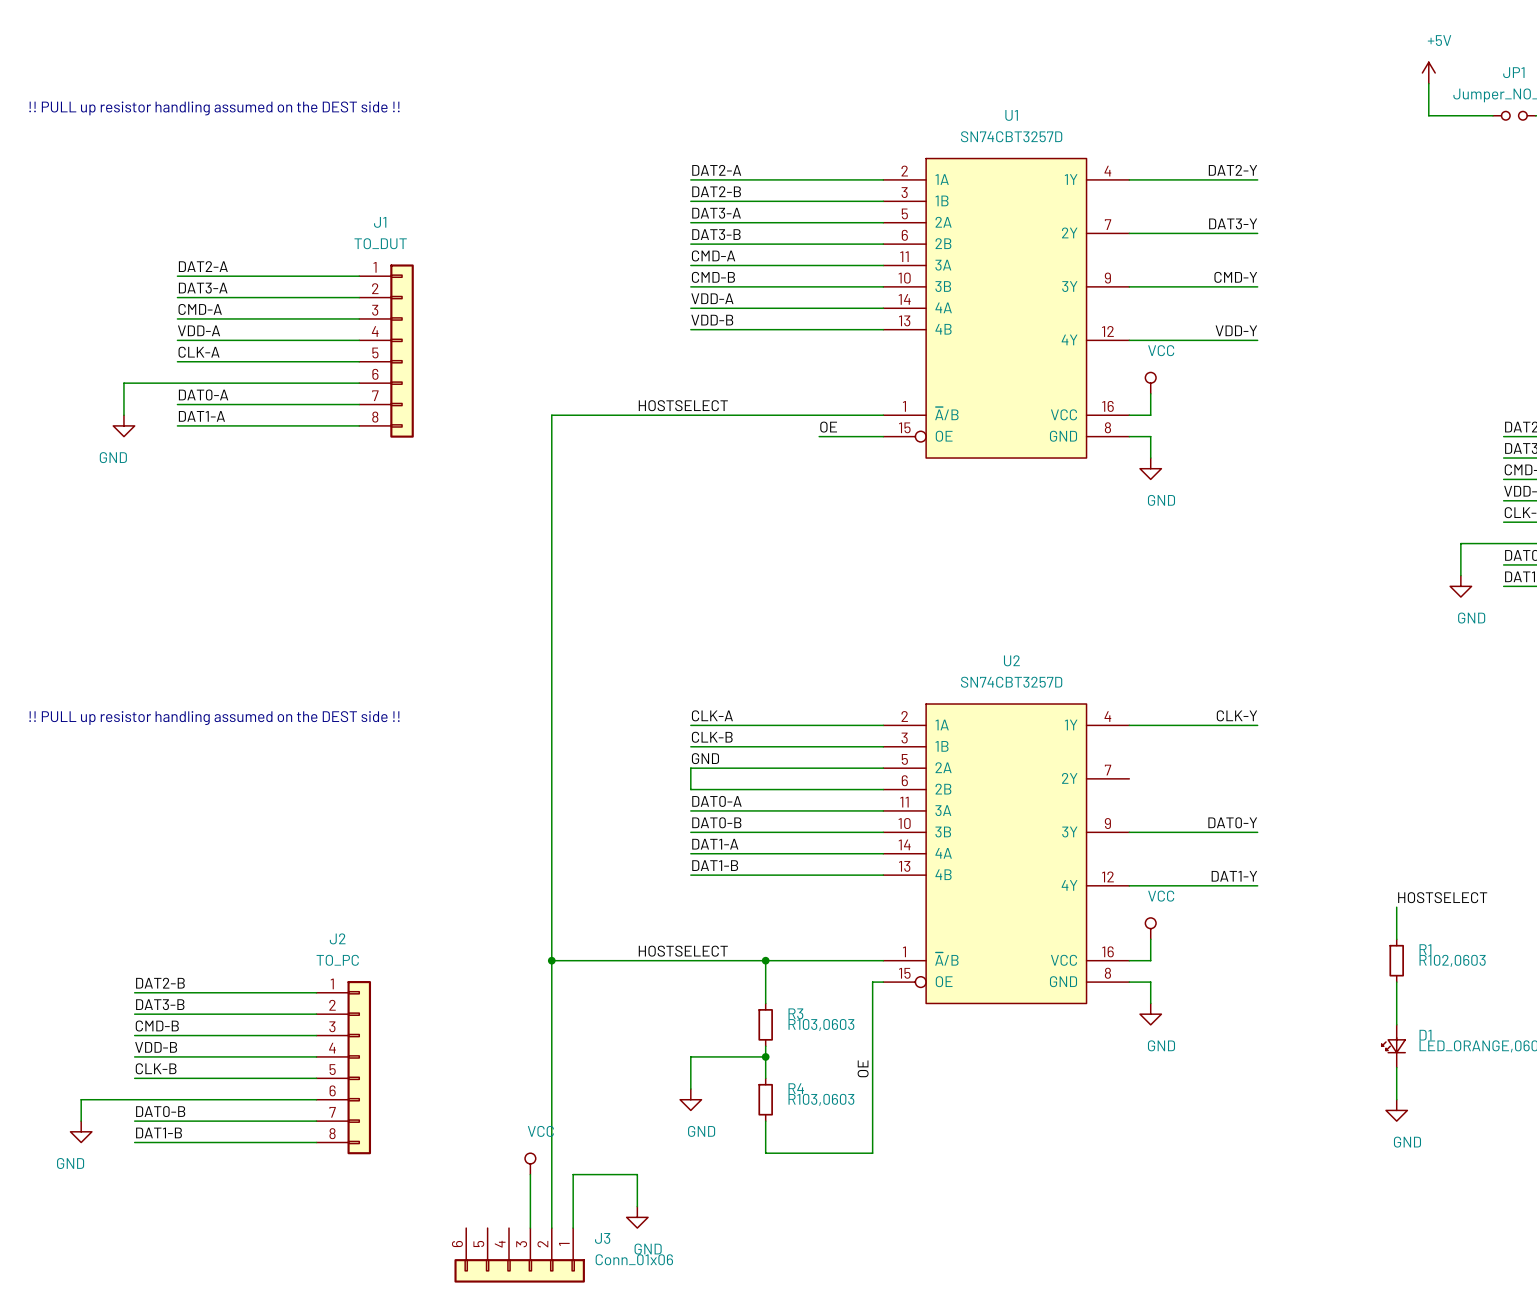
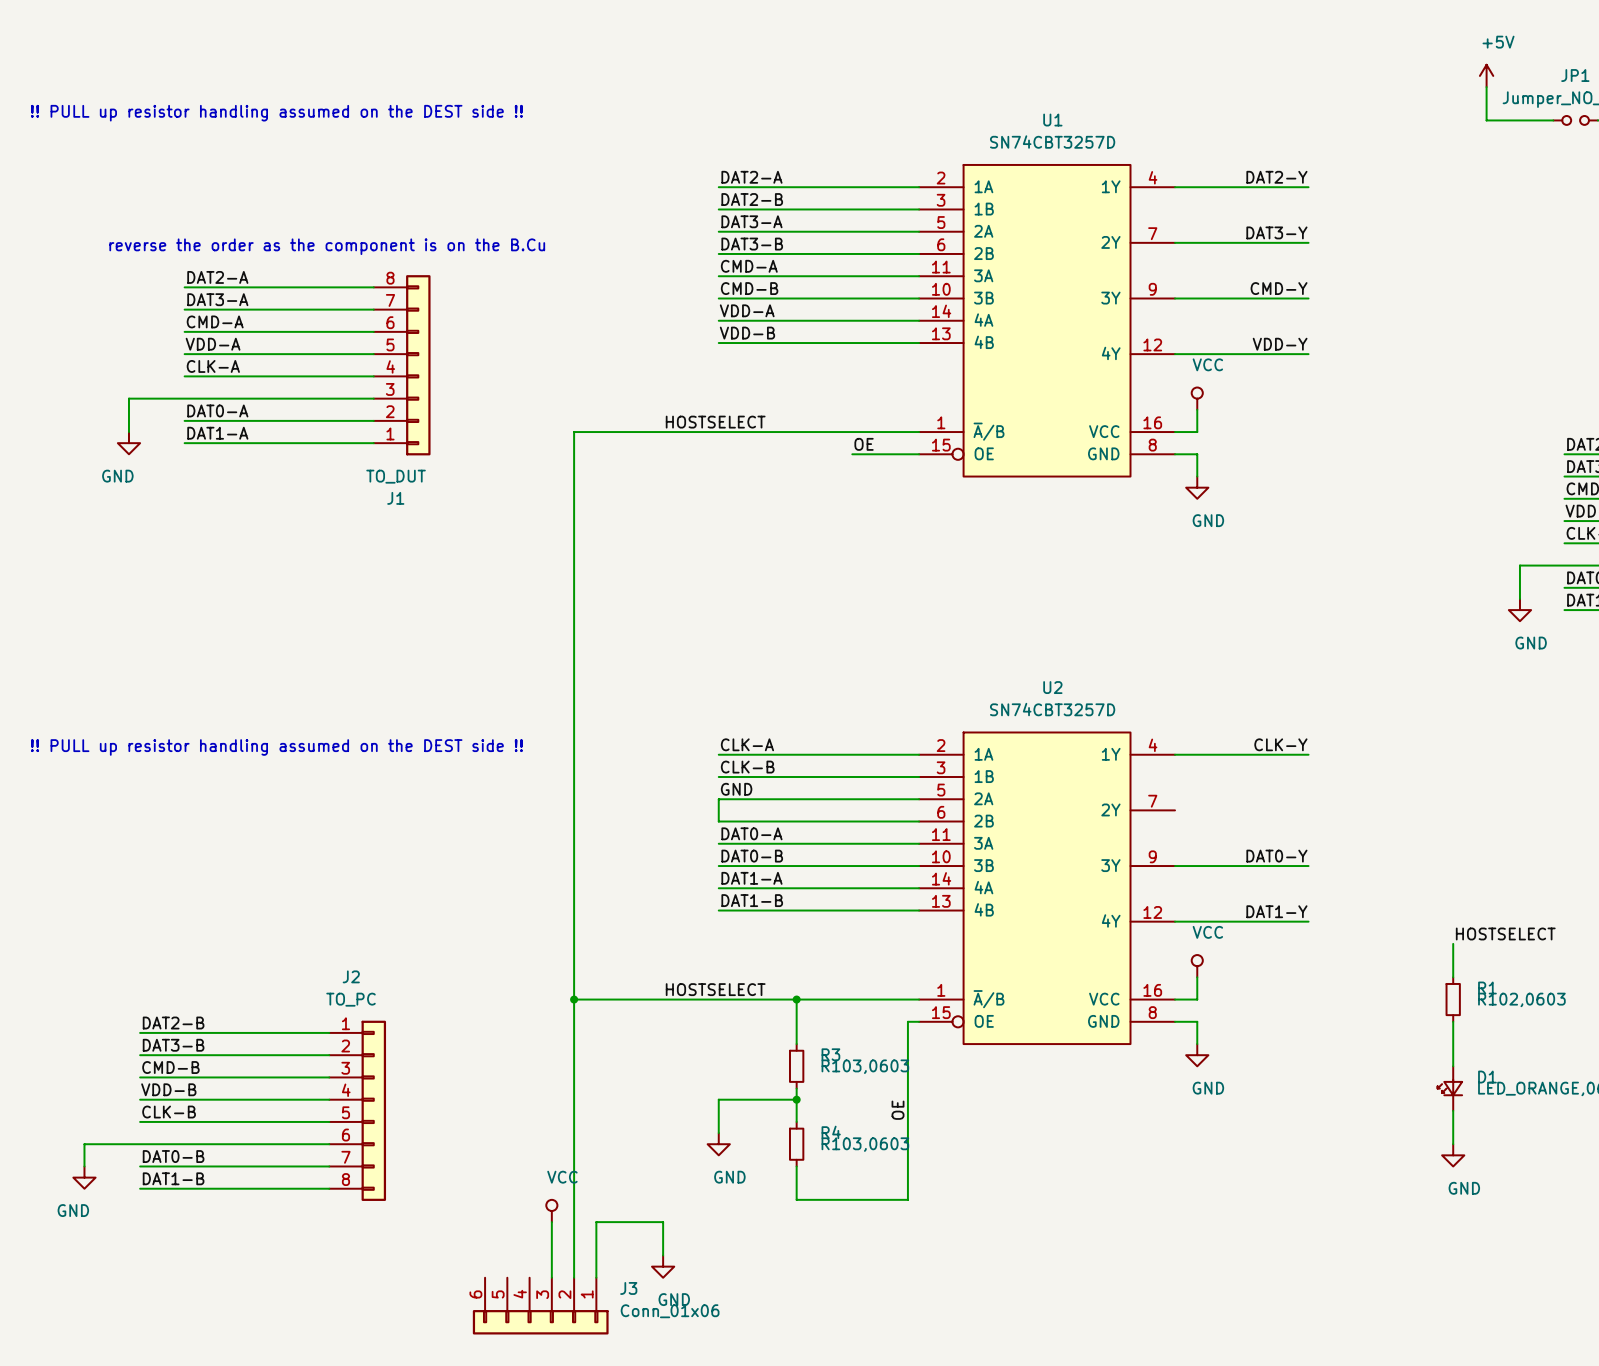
text: none -> reverse the order as the component is on the B.Cu (327, 246)
J1 flip: as is (402, 351) -> up-down (418, 365)

